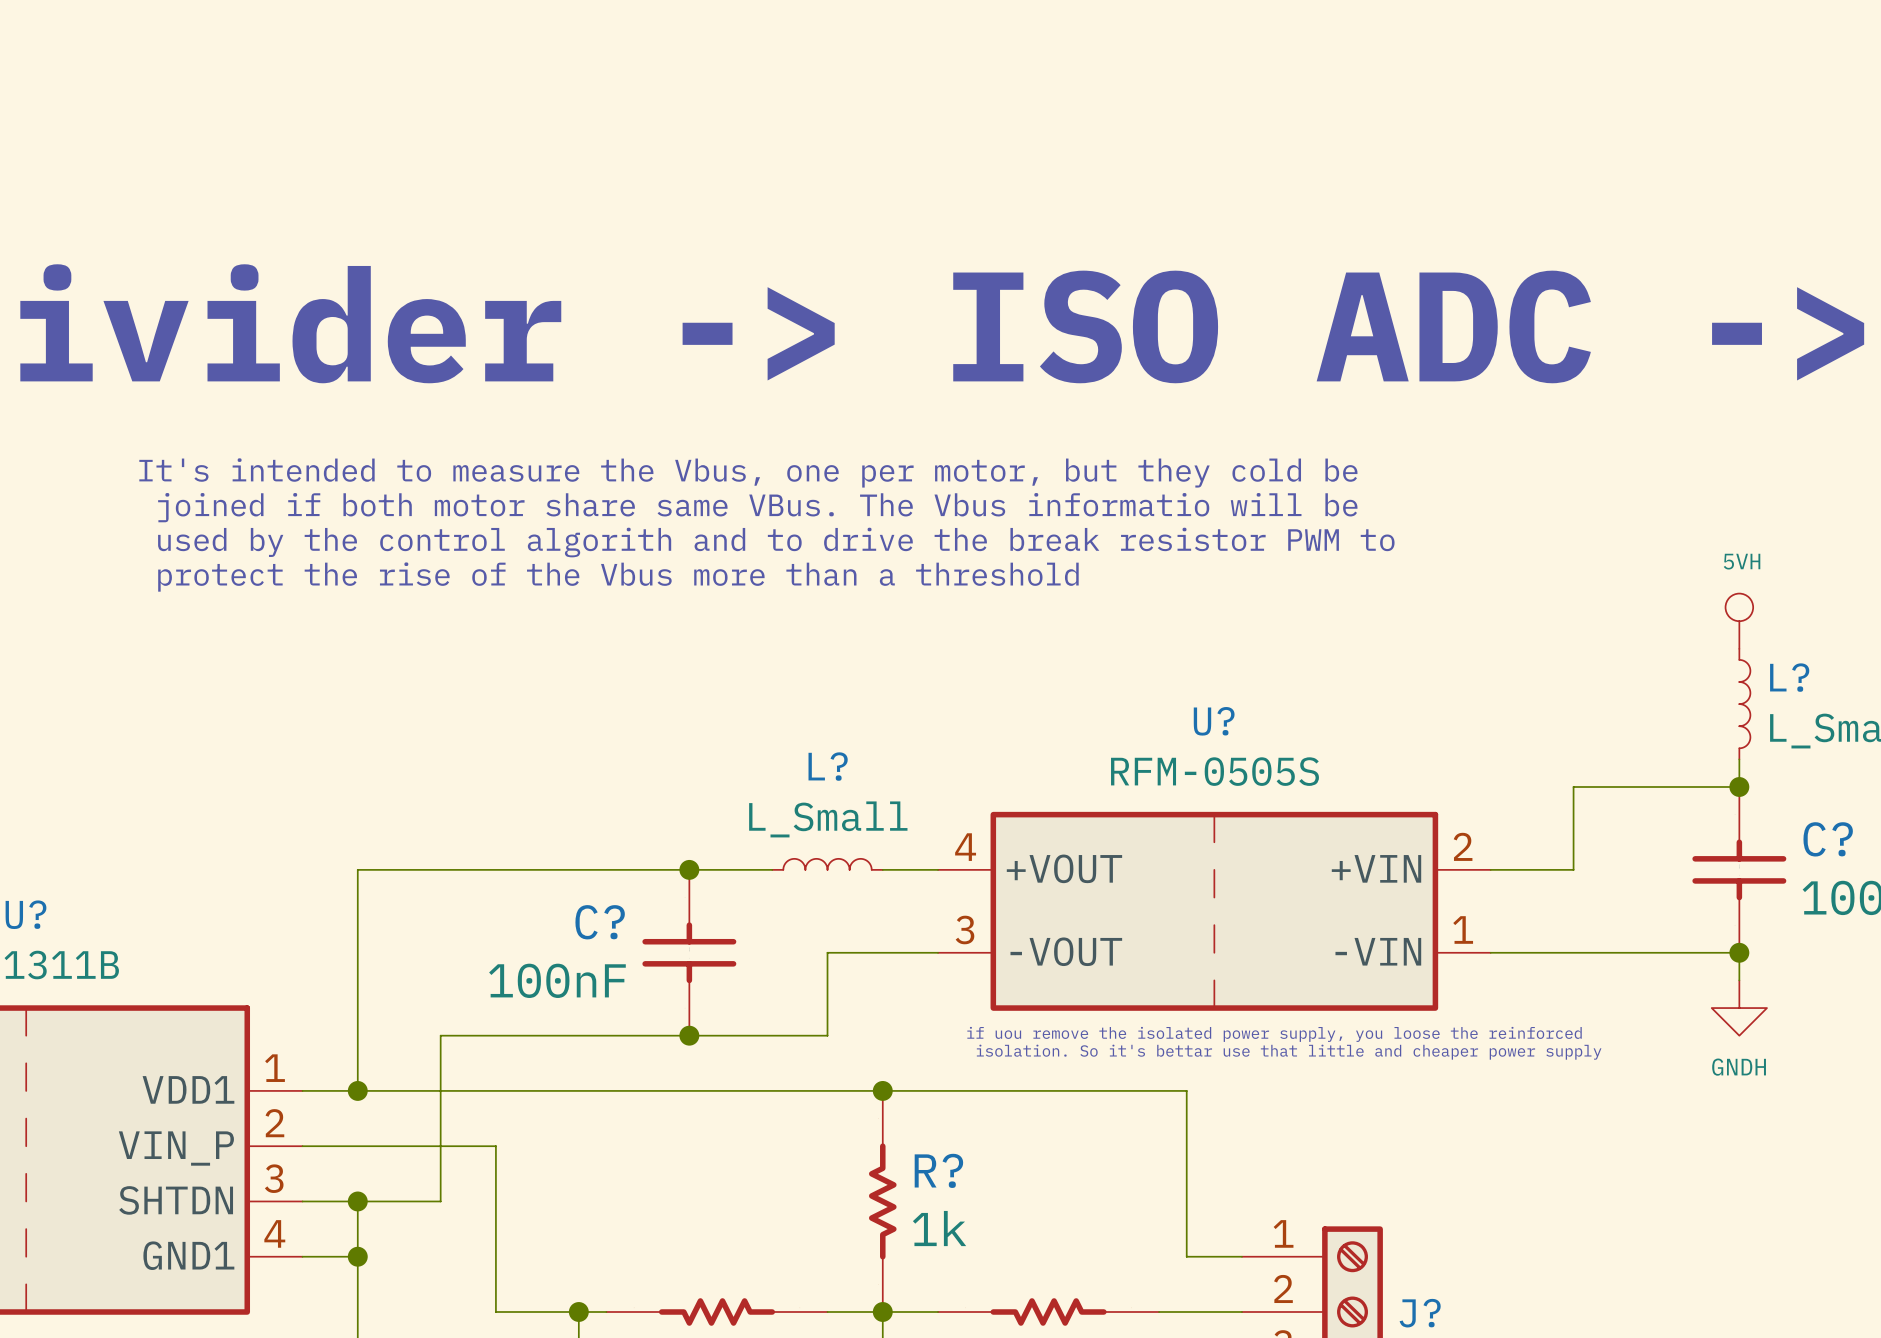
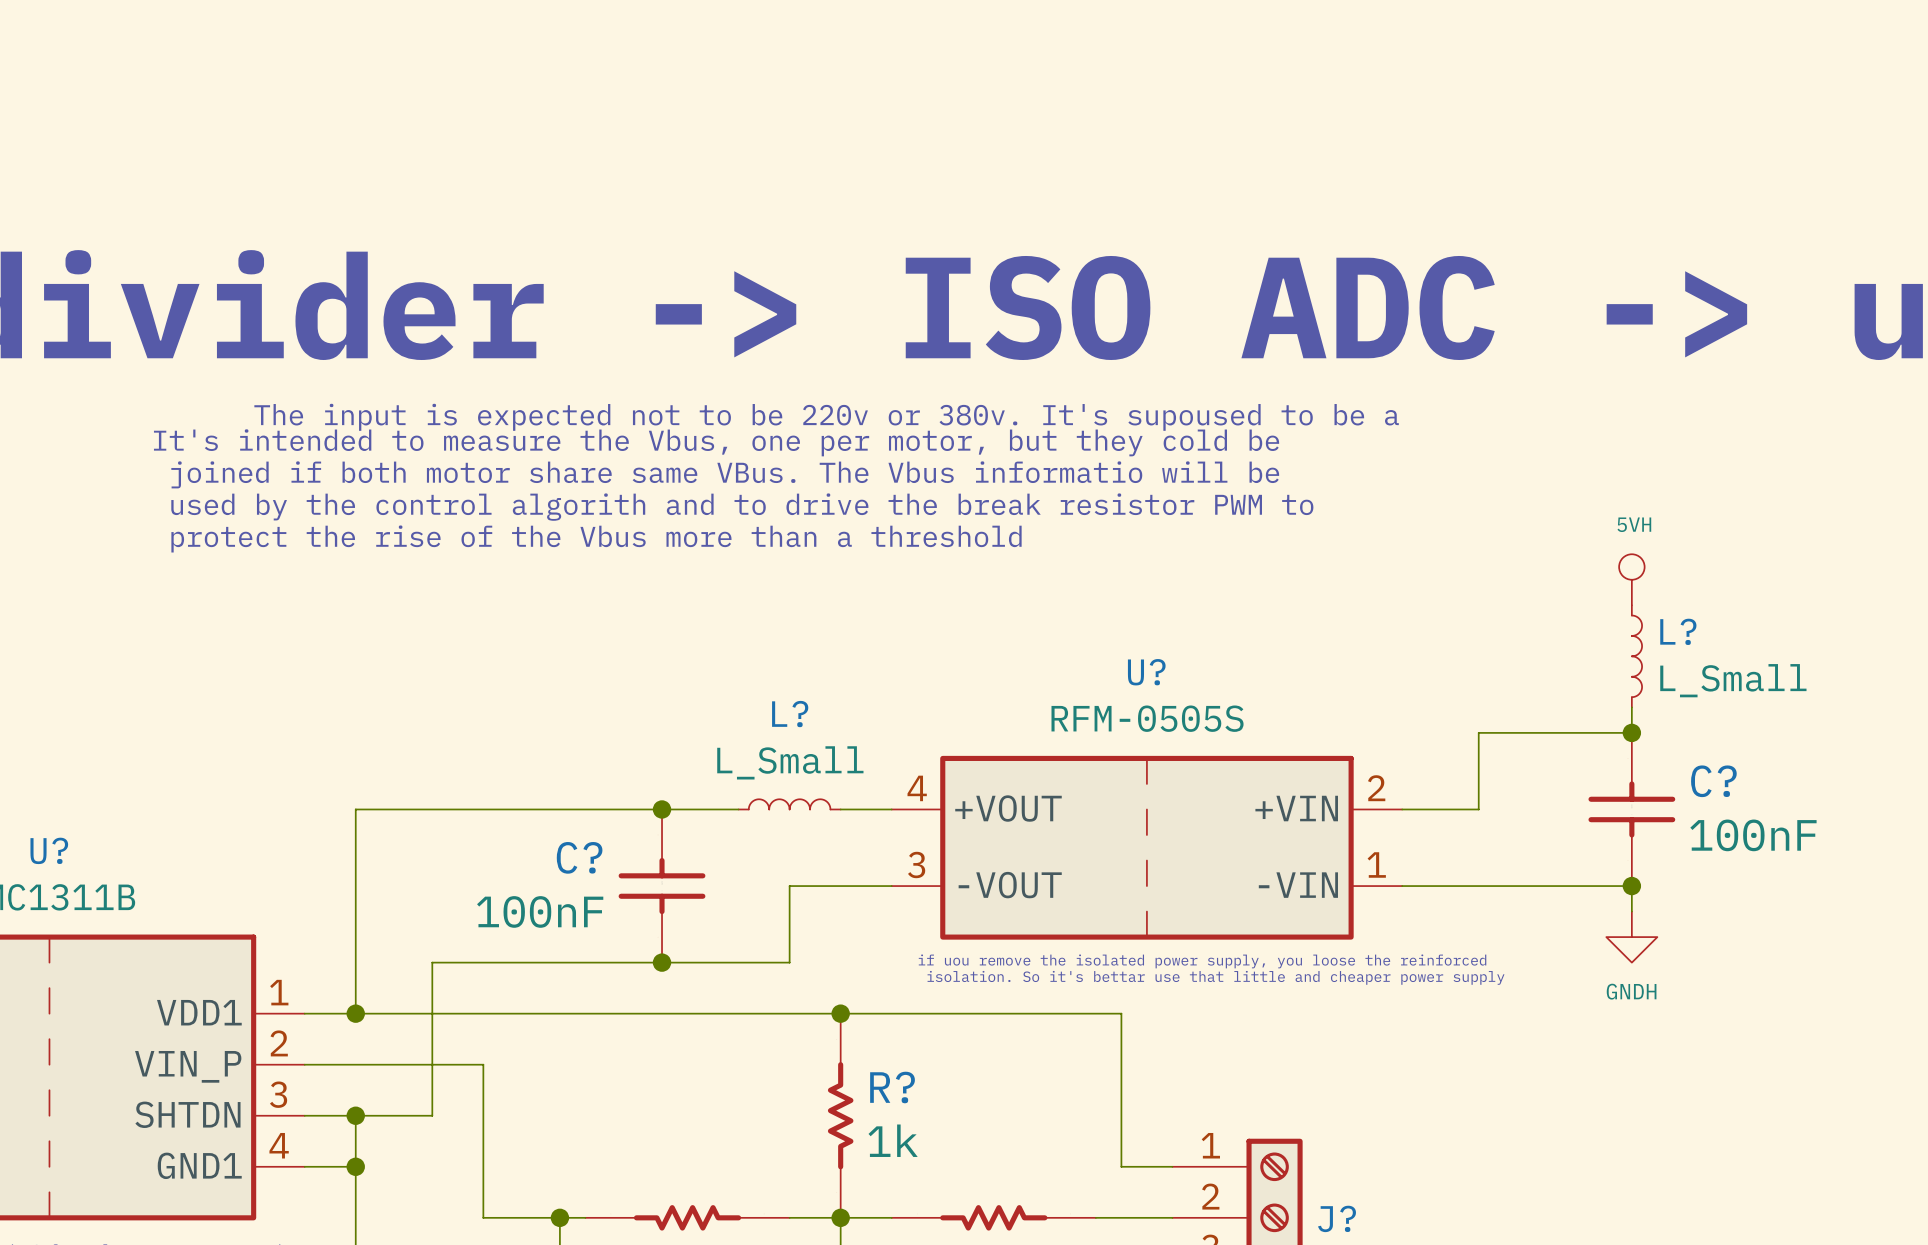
text: none -> The input is expected not to be 220v or 380v. It's supoused to be a (826, 417)

